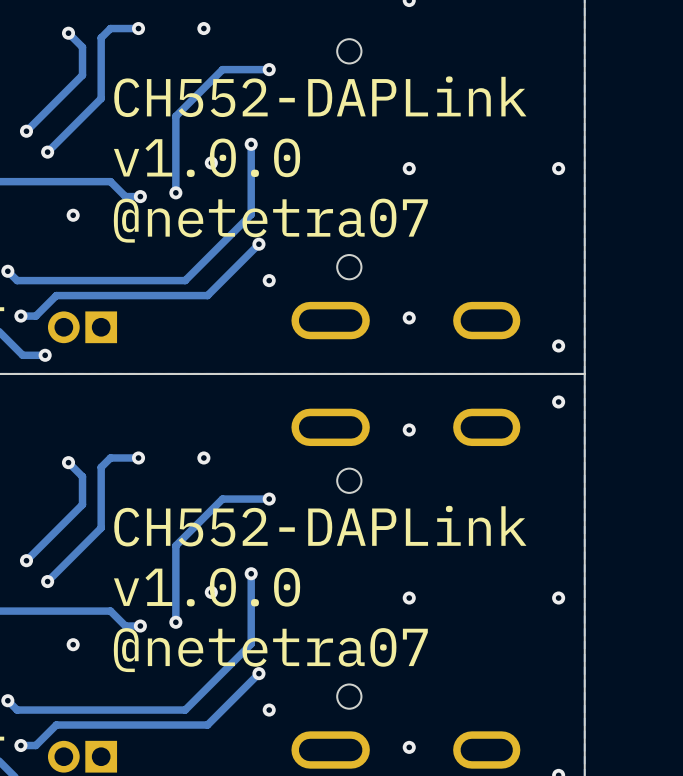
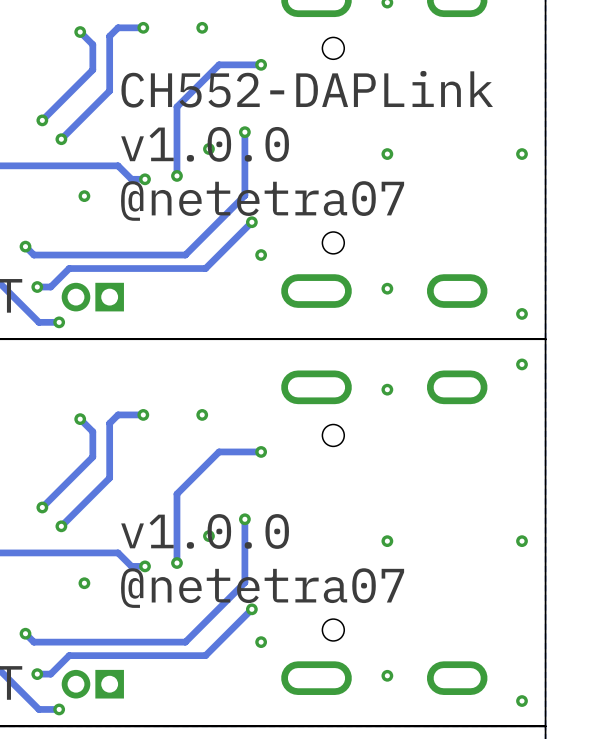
text: CH552-DAPLink (320, 526) -> none

